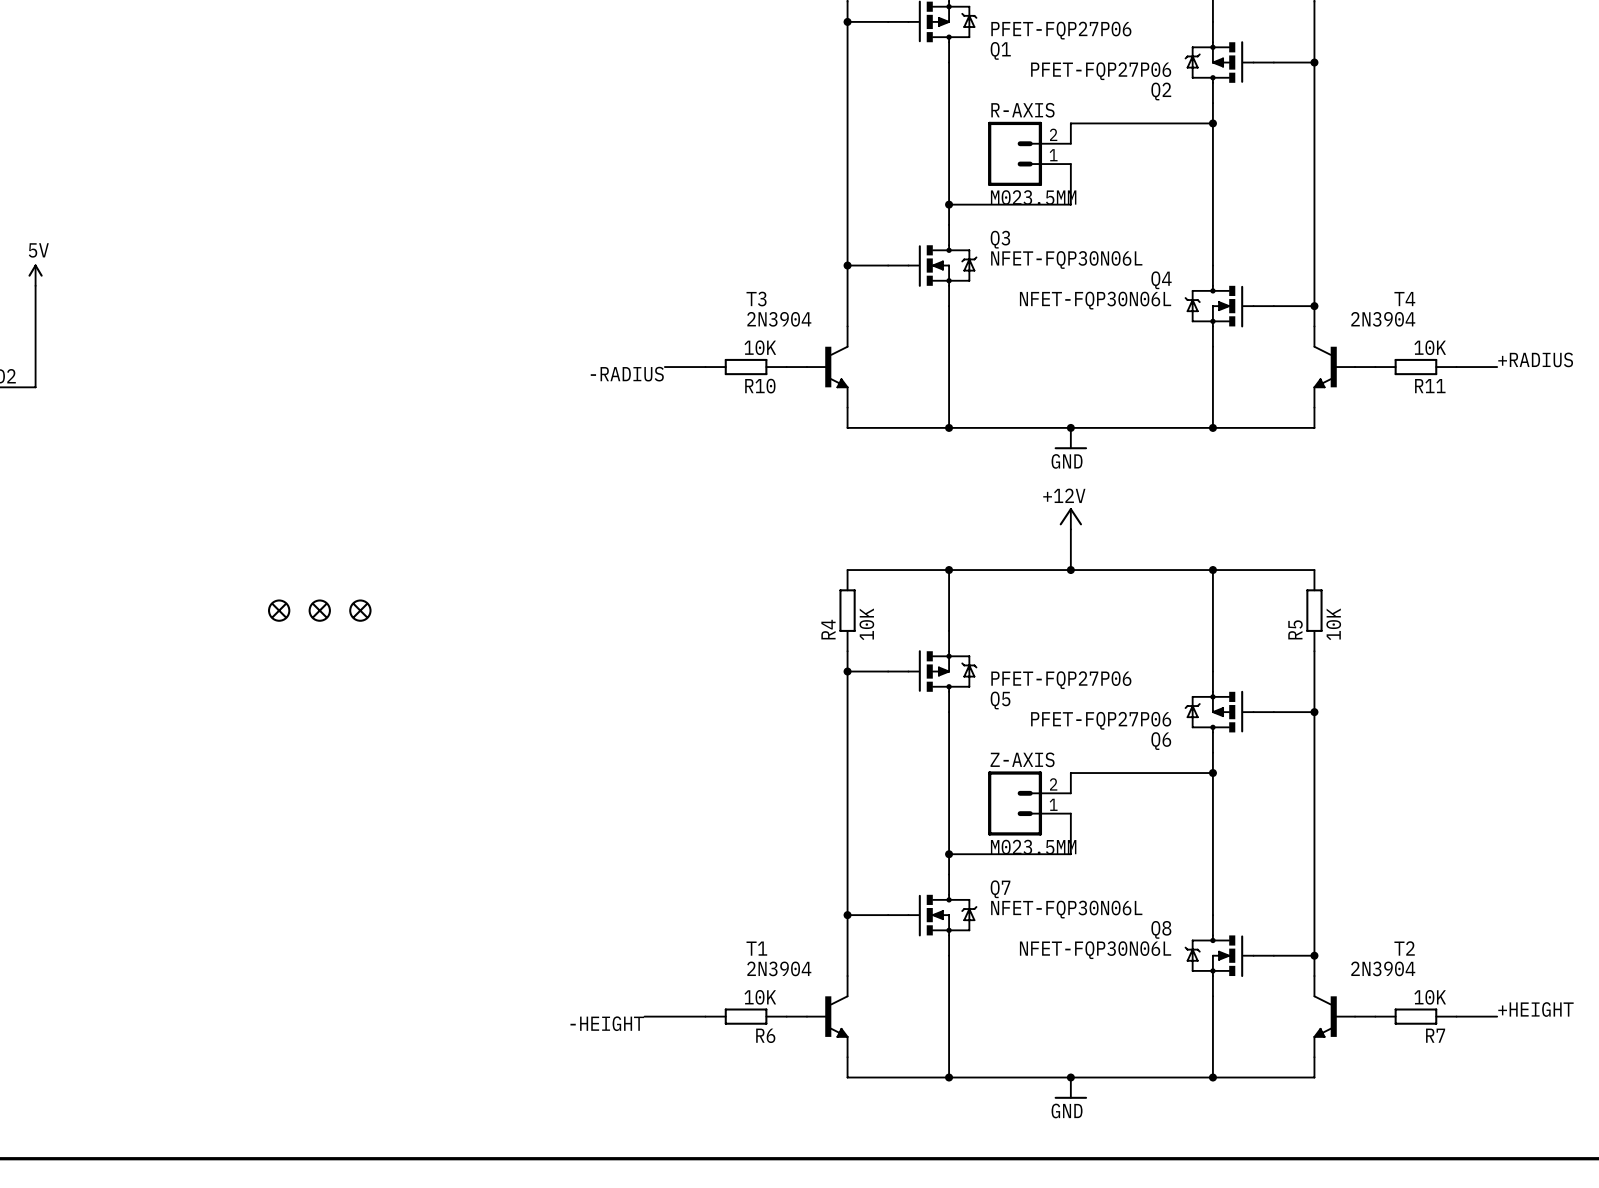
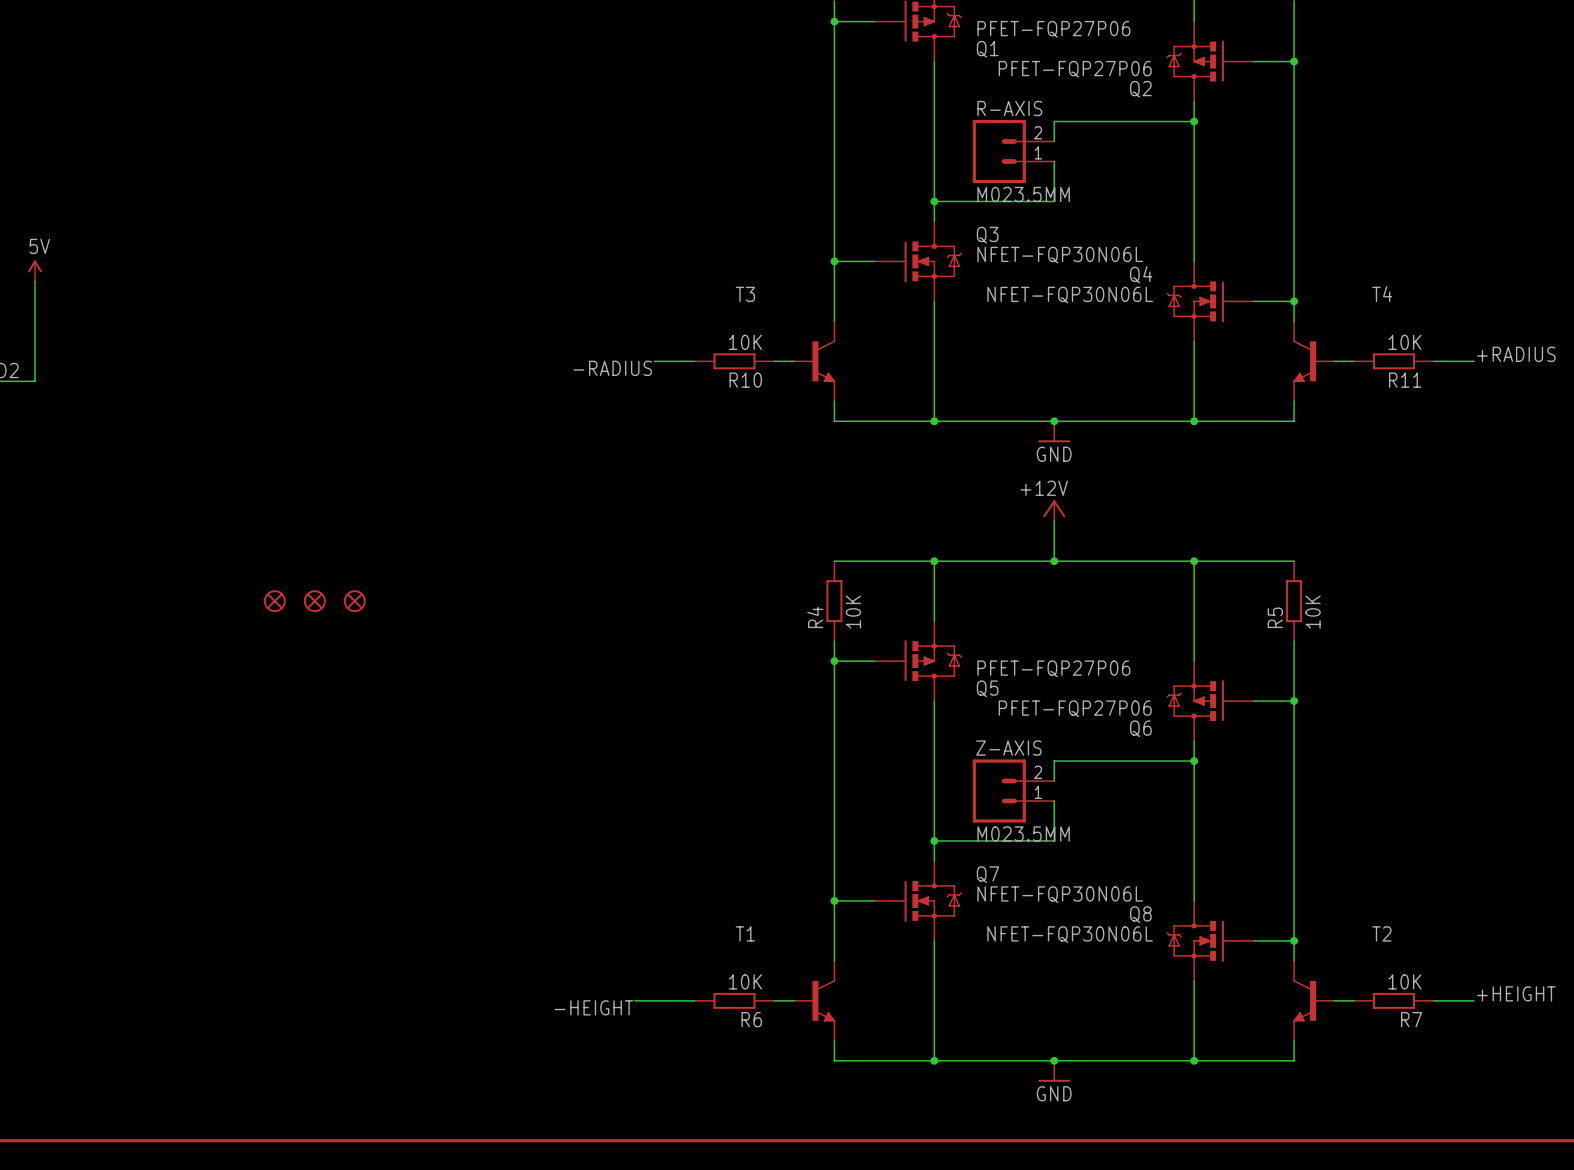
T3 value: 2N3904 (779, 319) -> none
T4 value: 2N3904 (1383, 319) -> none
T1 value: 2N3904 (779, 968) -> none
T2 value: 2N3904 (1383, 968) -> none

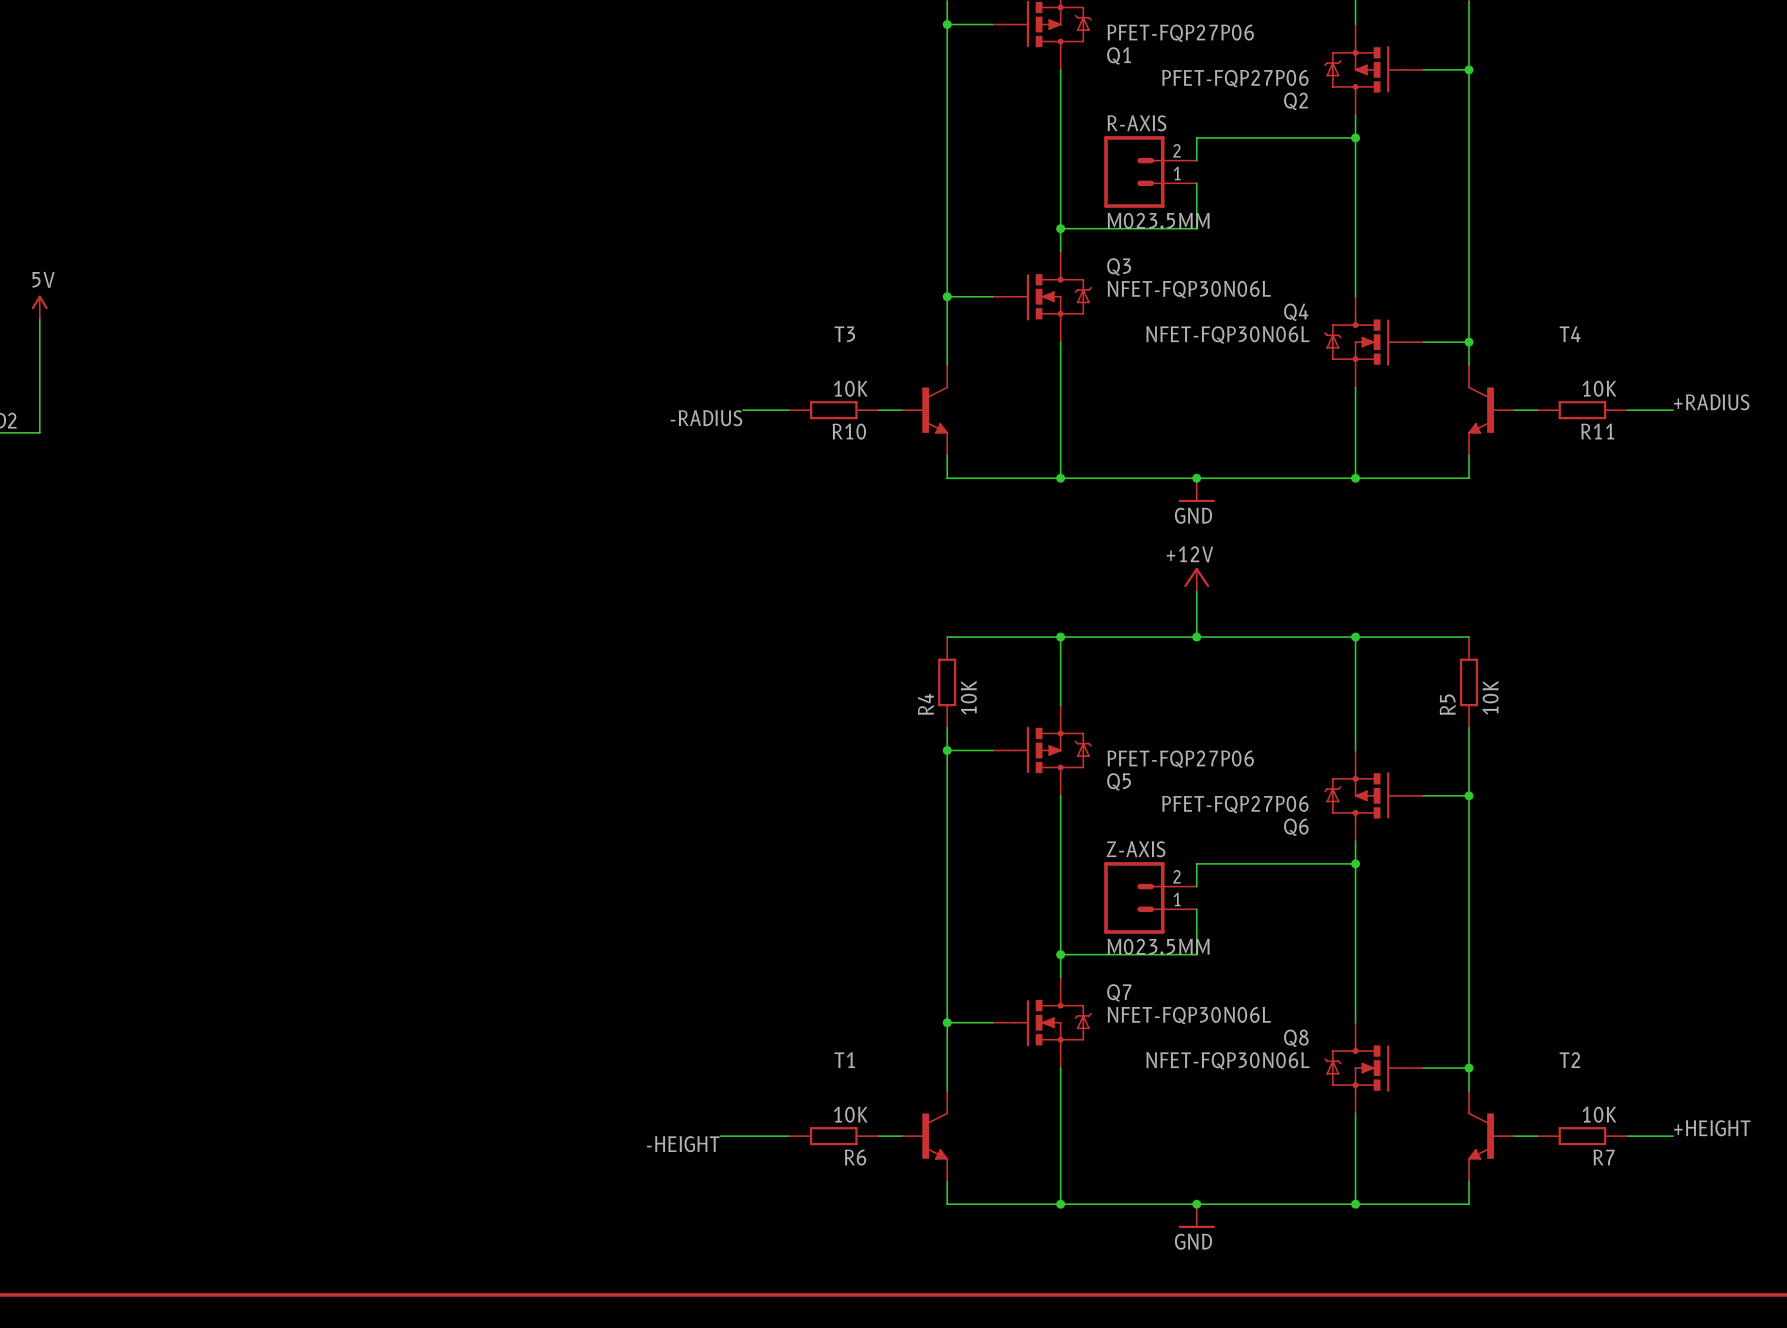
part: (274, 601) -> none
part: (314, 601) -> none
part: (354, 601) -> none

